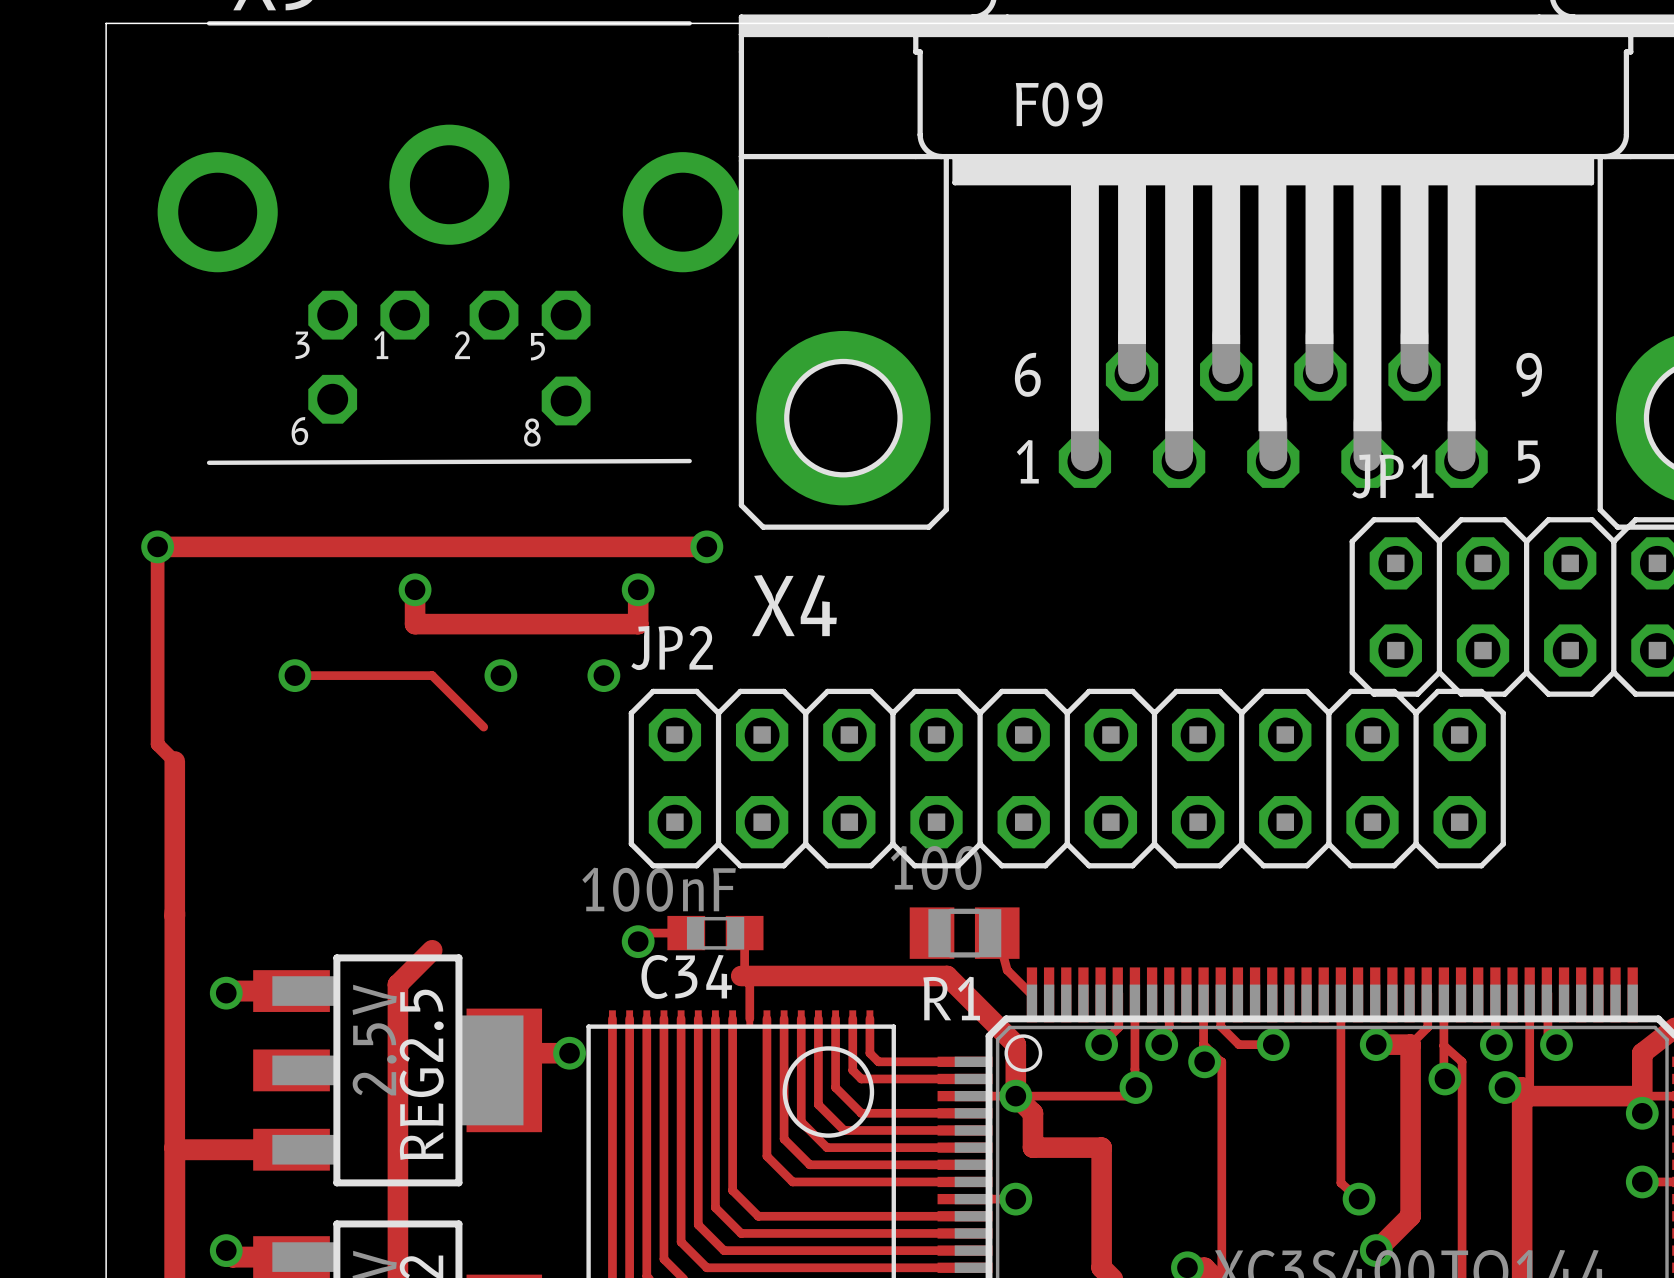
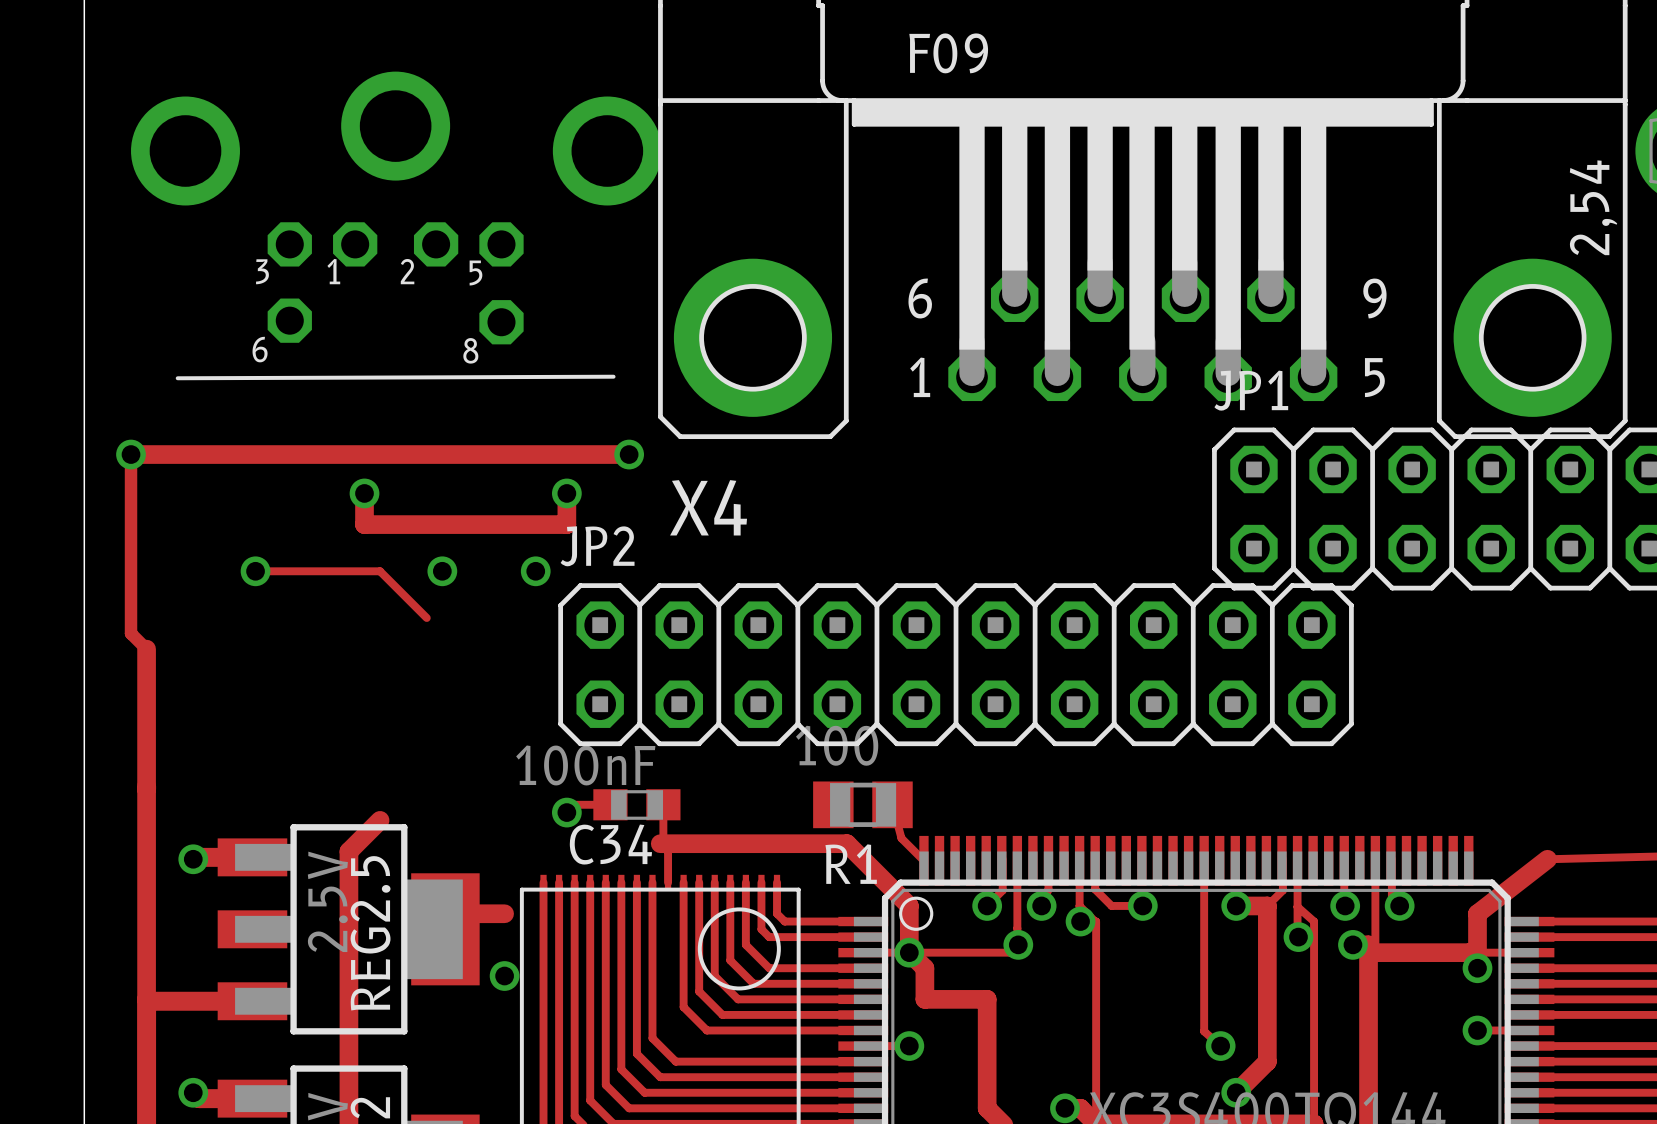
via position: (569, 1053) -> (504, 976)

